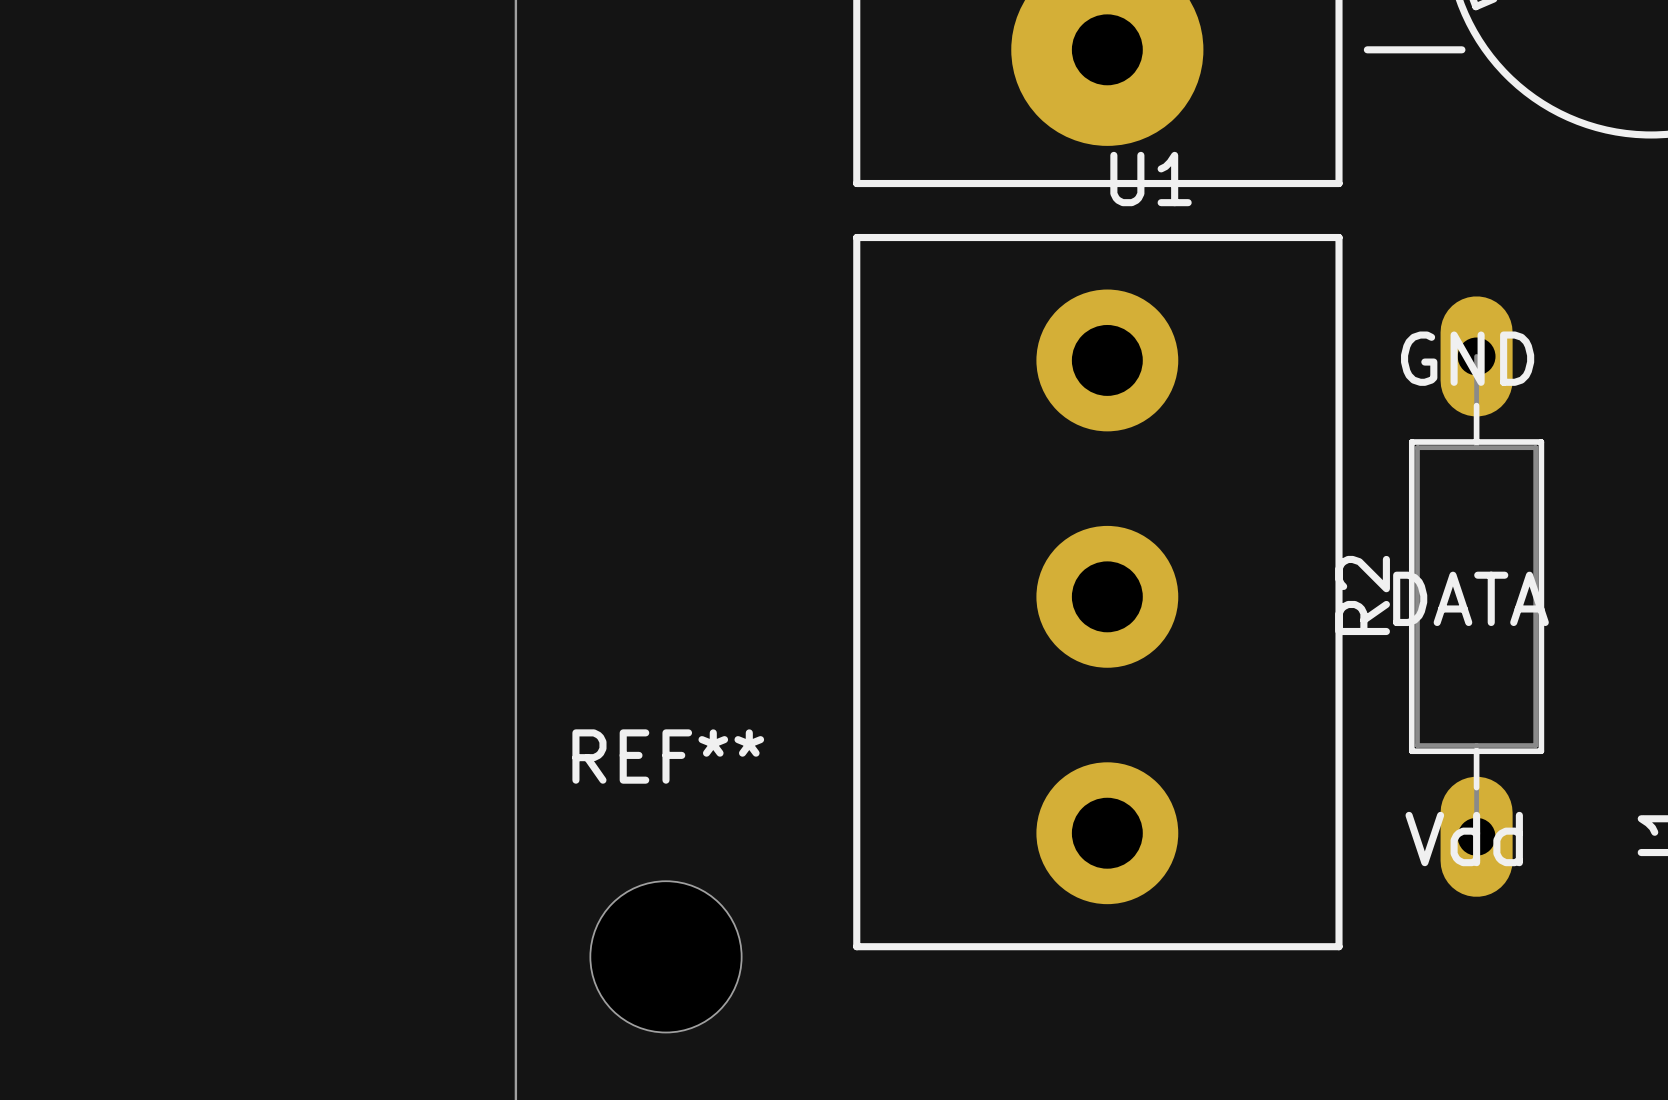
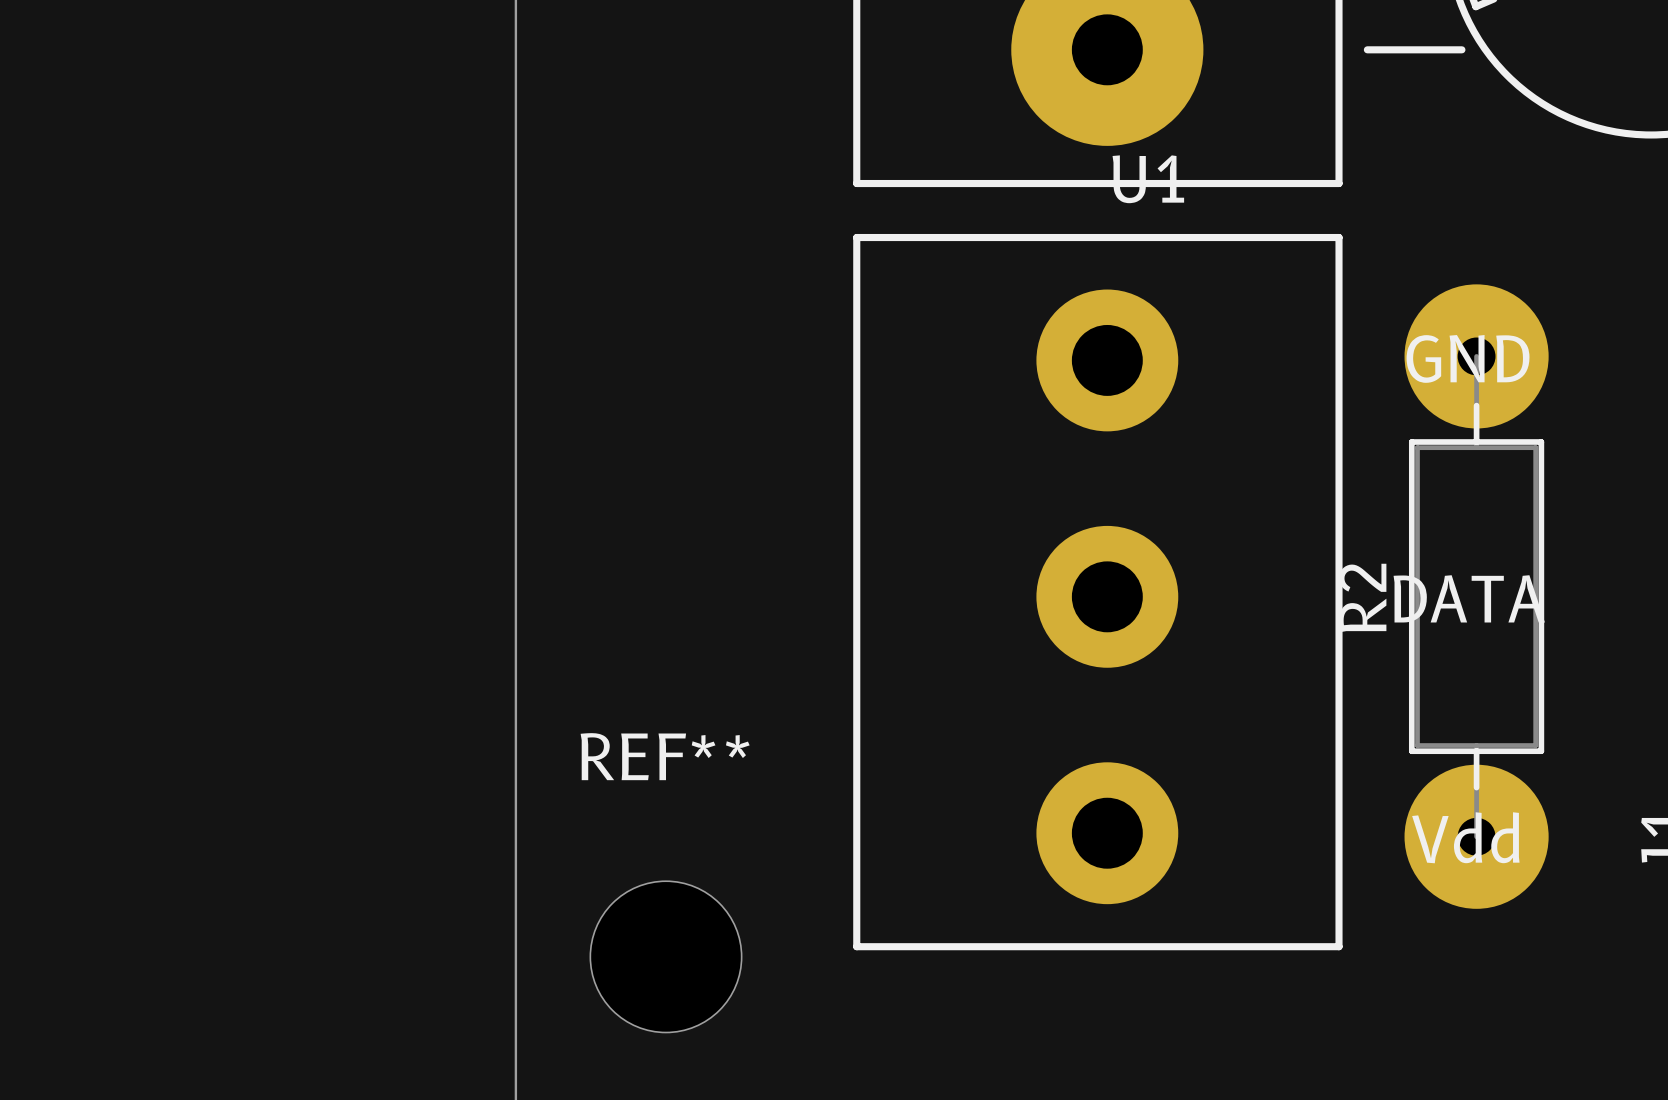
R2 footprint: [1408, 296, 1545, 897] -> [1404, 284, 1549, 909]

